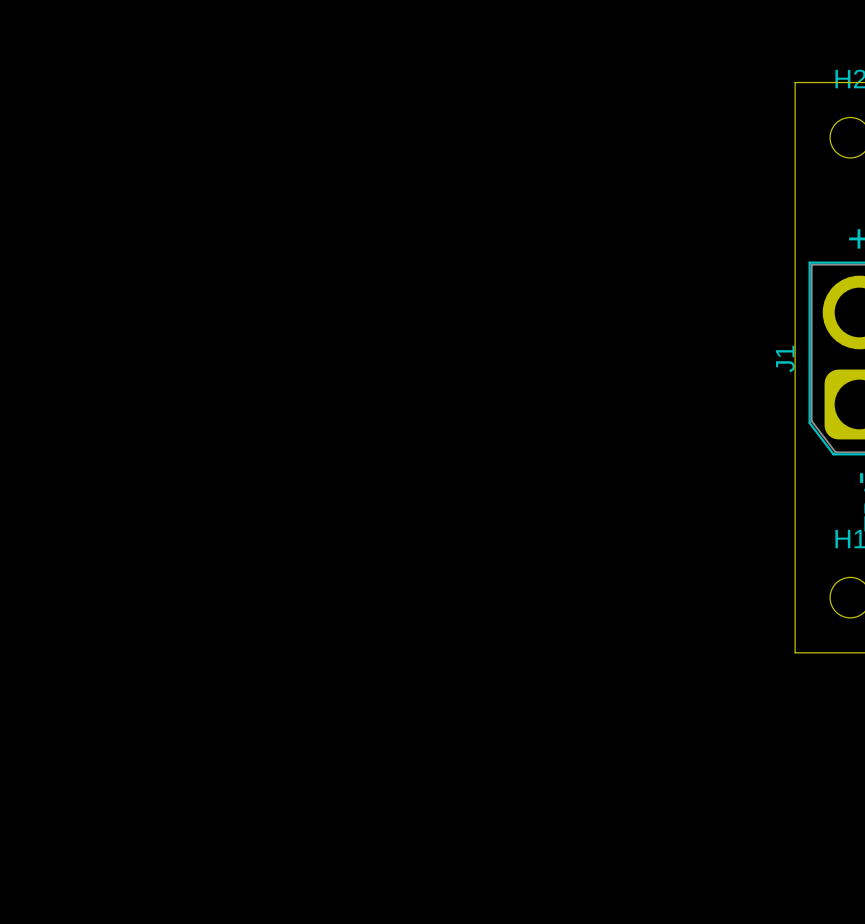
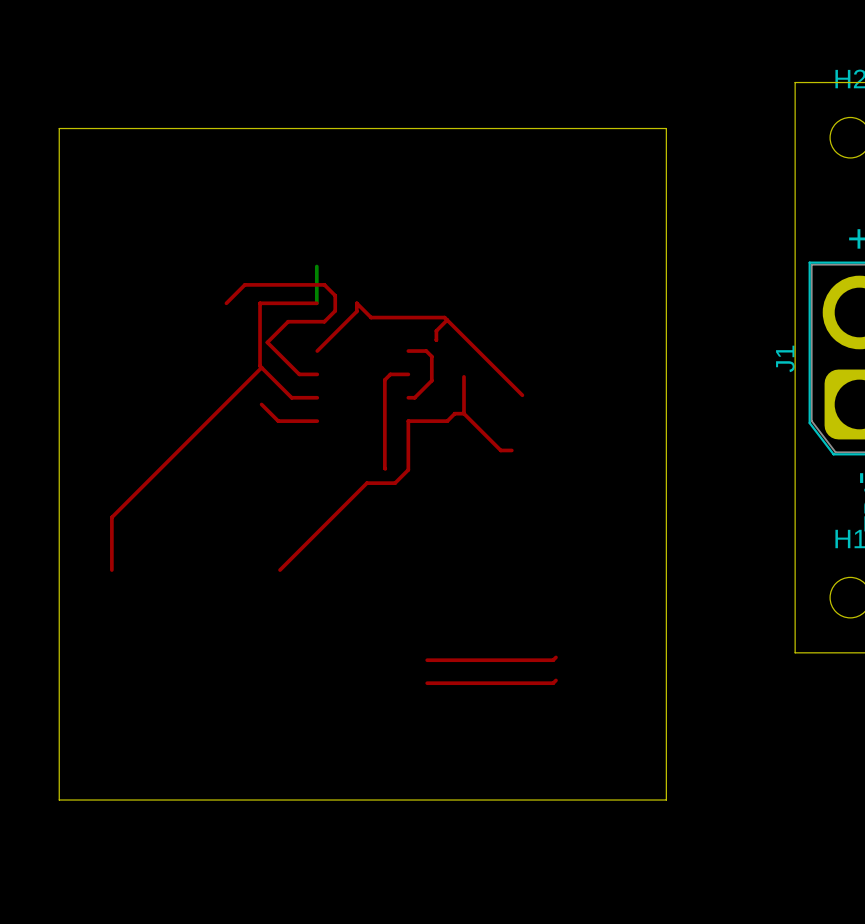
board edge: none -> (59, 128) (666, 128) (666, 800) (59, 800) (59, 128)
bottom track: none -> (316, 266) (316, 303)
top track: none -> (226, 303) (244, 284) (324, 284) (335, 295) (335, 310) (324, 321) (288, 321) (267, 342) (299, 374) (317, 374)
top track: none -> (316, 303) (260, 303) (260, 366) (291, 397) (317, 397)
top track: none -> (447, 320) (436, 330) (436, 340)
top track: none -> (317, 351) (356, 311) (356, 303) (371, 317) (444, 317) (522, 395)
top track: none -> (408, 351) (426, 351) (431, 356) (431, 380) (414, 397) (408, 397)
top track: none -> (261, 367) (111, 517) (111, 570)
top track: none -> (408, 374) (390, 374) (384, 379) (385, 468)
top track: none -> (463, 376) (463, 413)
top track: none -> (261, 404) (278, 421) (317, 421)
top track: none -> (463, 413) (500, 450) (511, 450)
top track: none -> (463, 413) (454, 413) (447, 421) (408, 421) (408, 469) (395, 483) (366, 483) (280, 570)
top track: none -> (555, 657) (553, 660) (427, 660)
top track: none -> (555, 680) (553, 683) (427, 683)

